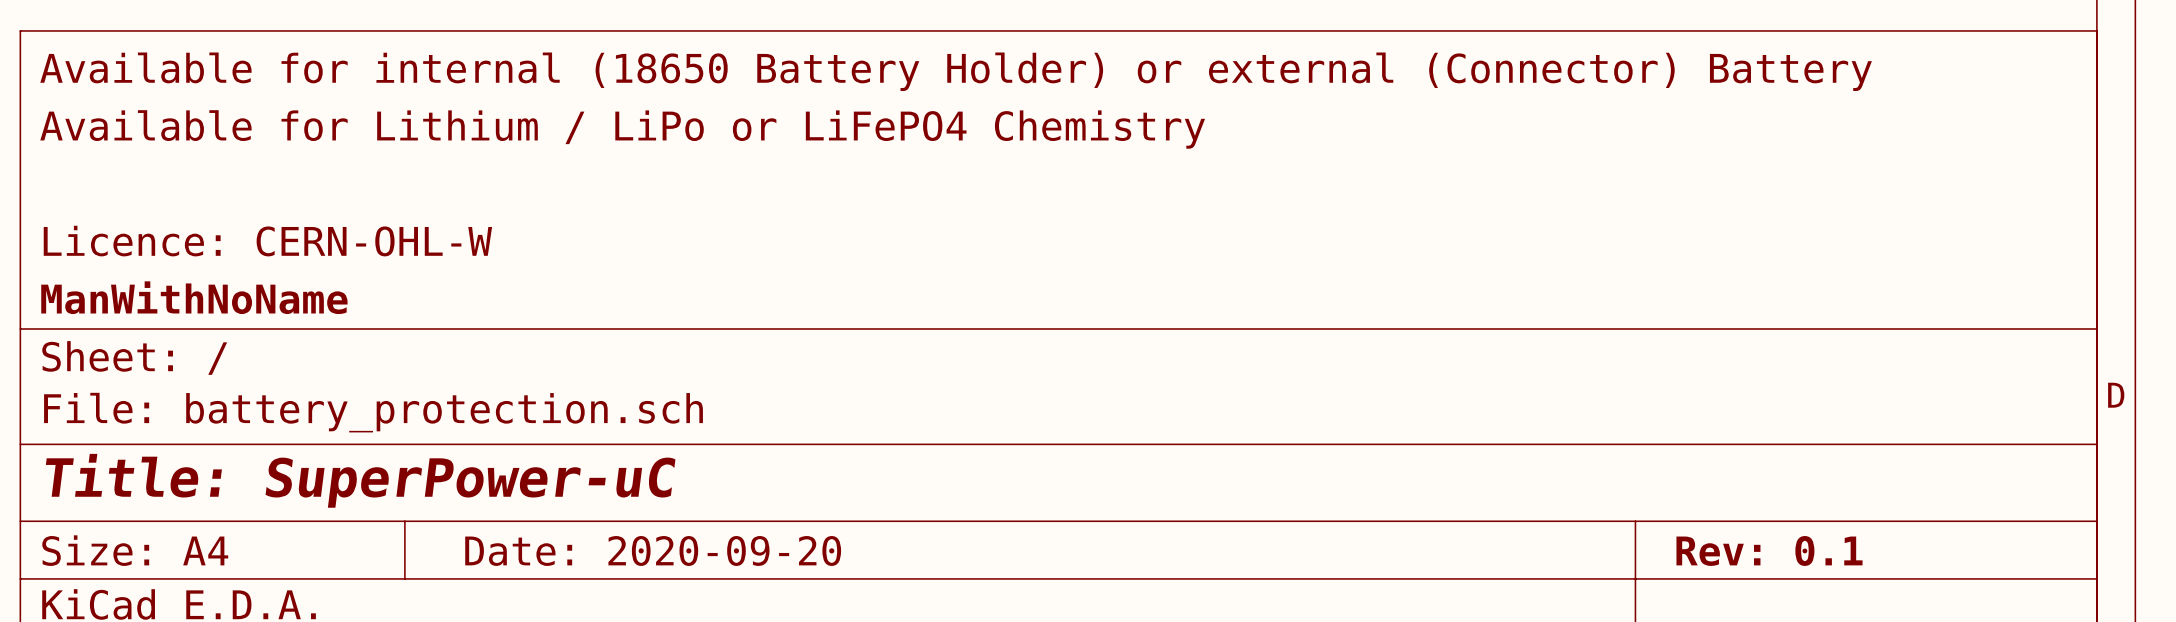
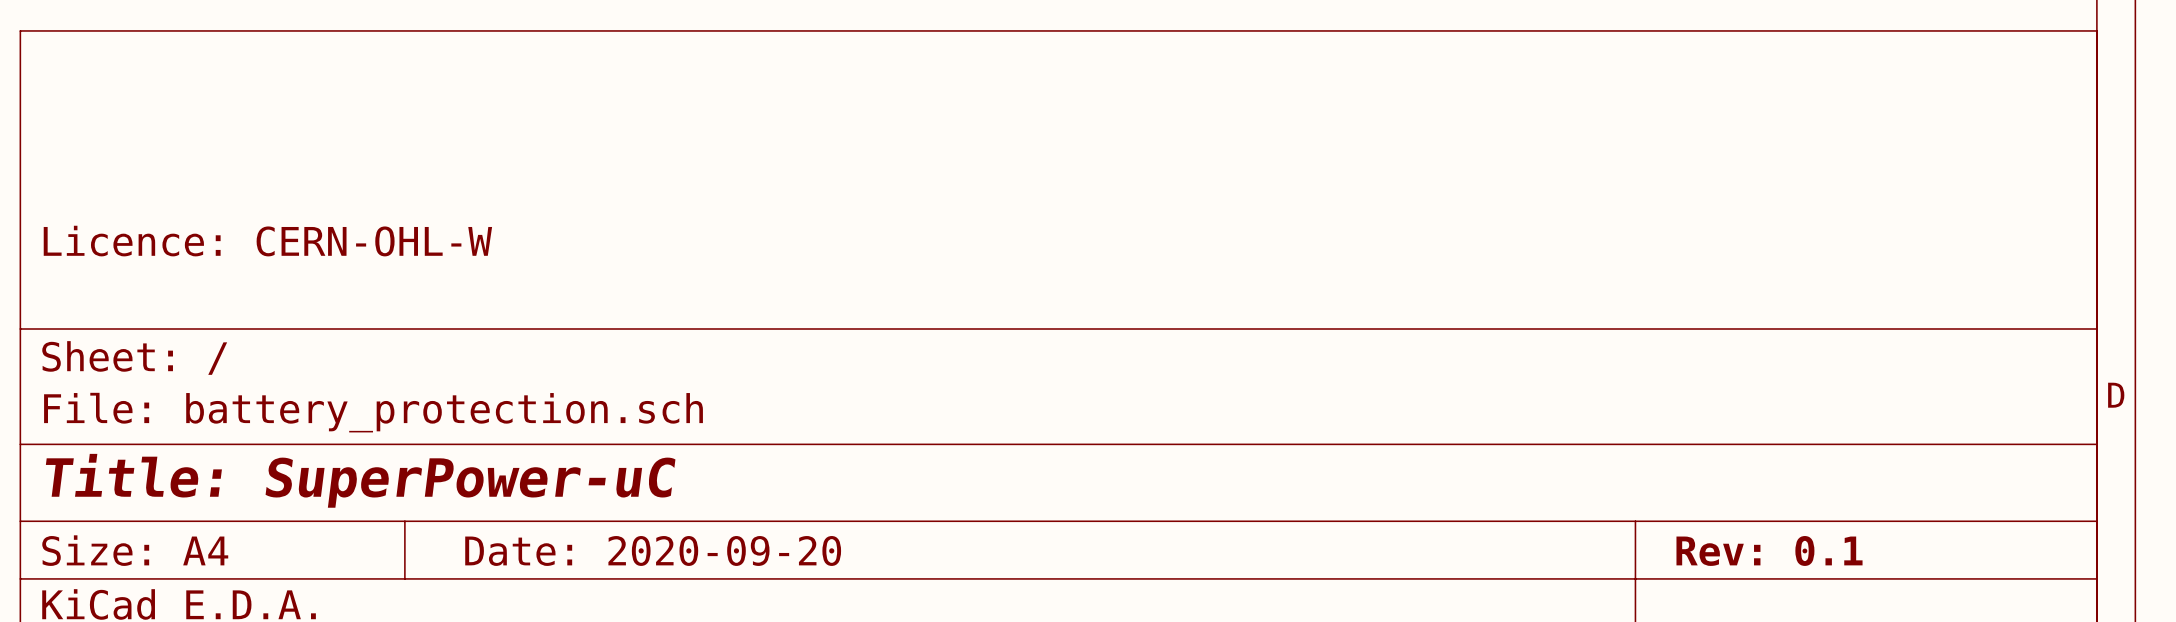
title block: Available for internal (18650 Battery Holder) or external (Connector) Battery (956, 71) -> none
title block: Available for Lithium / LiPo or LiFePO4 Chemistry (622, 129) -> none
title block: ManWithNoName (194, 297) -> none

